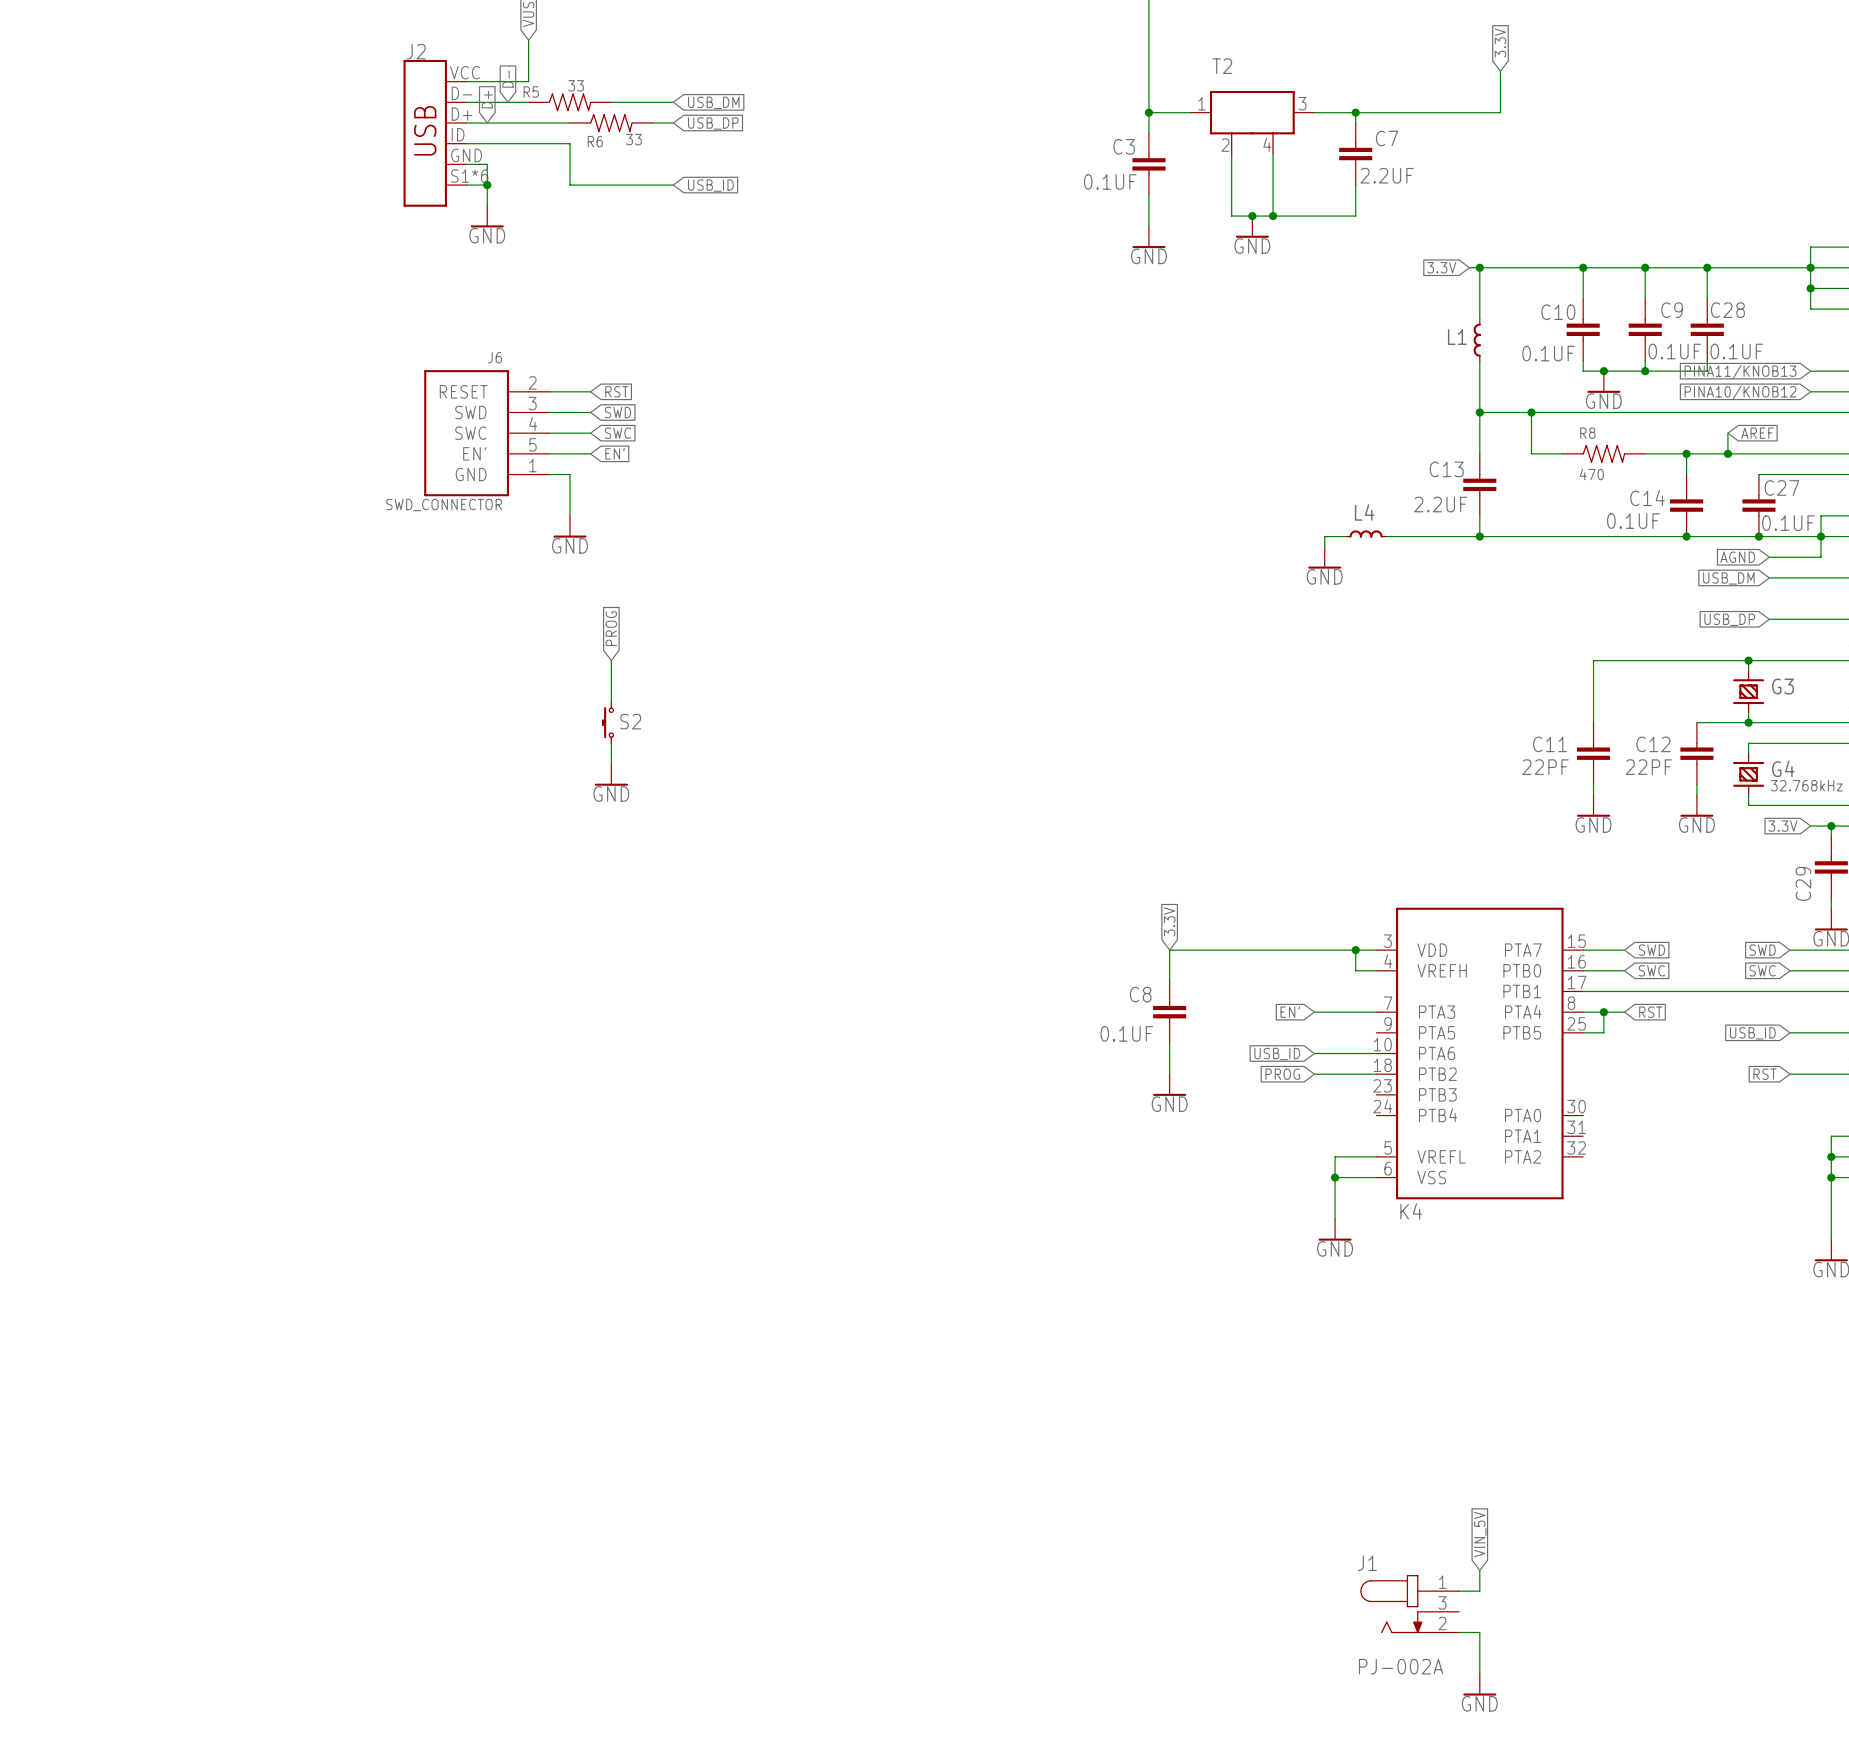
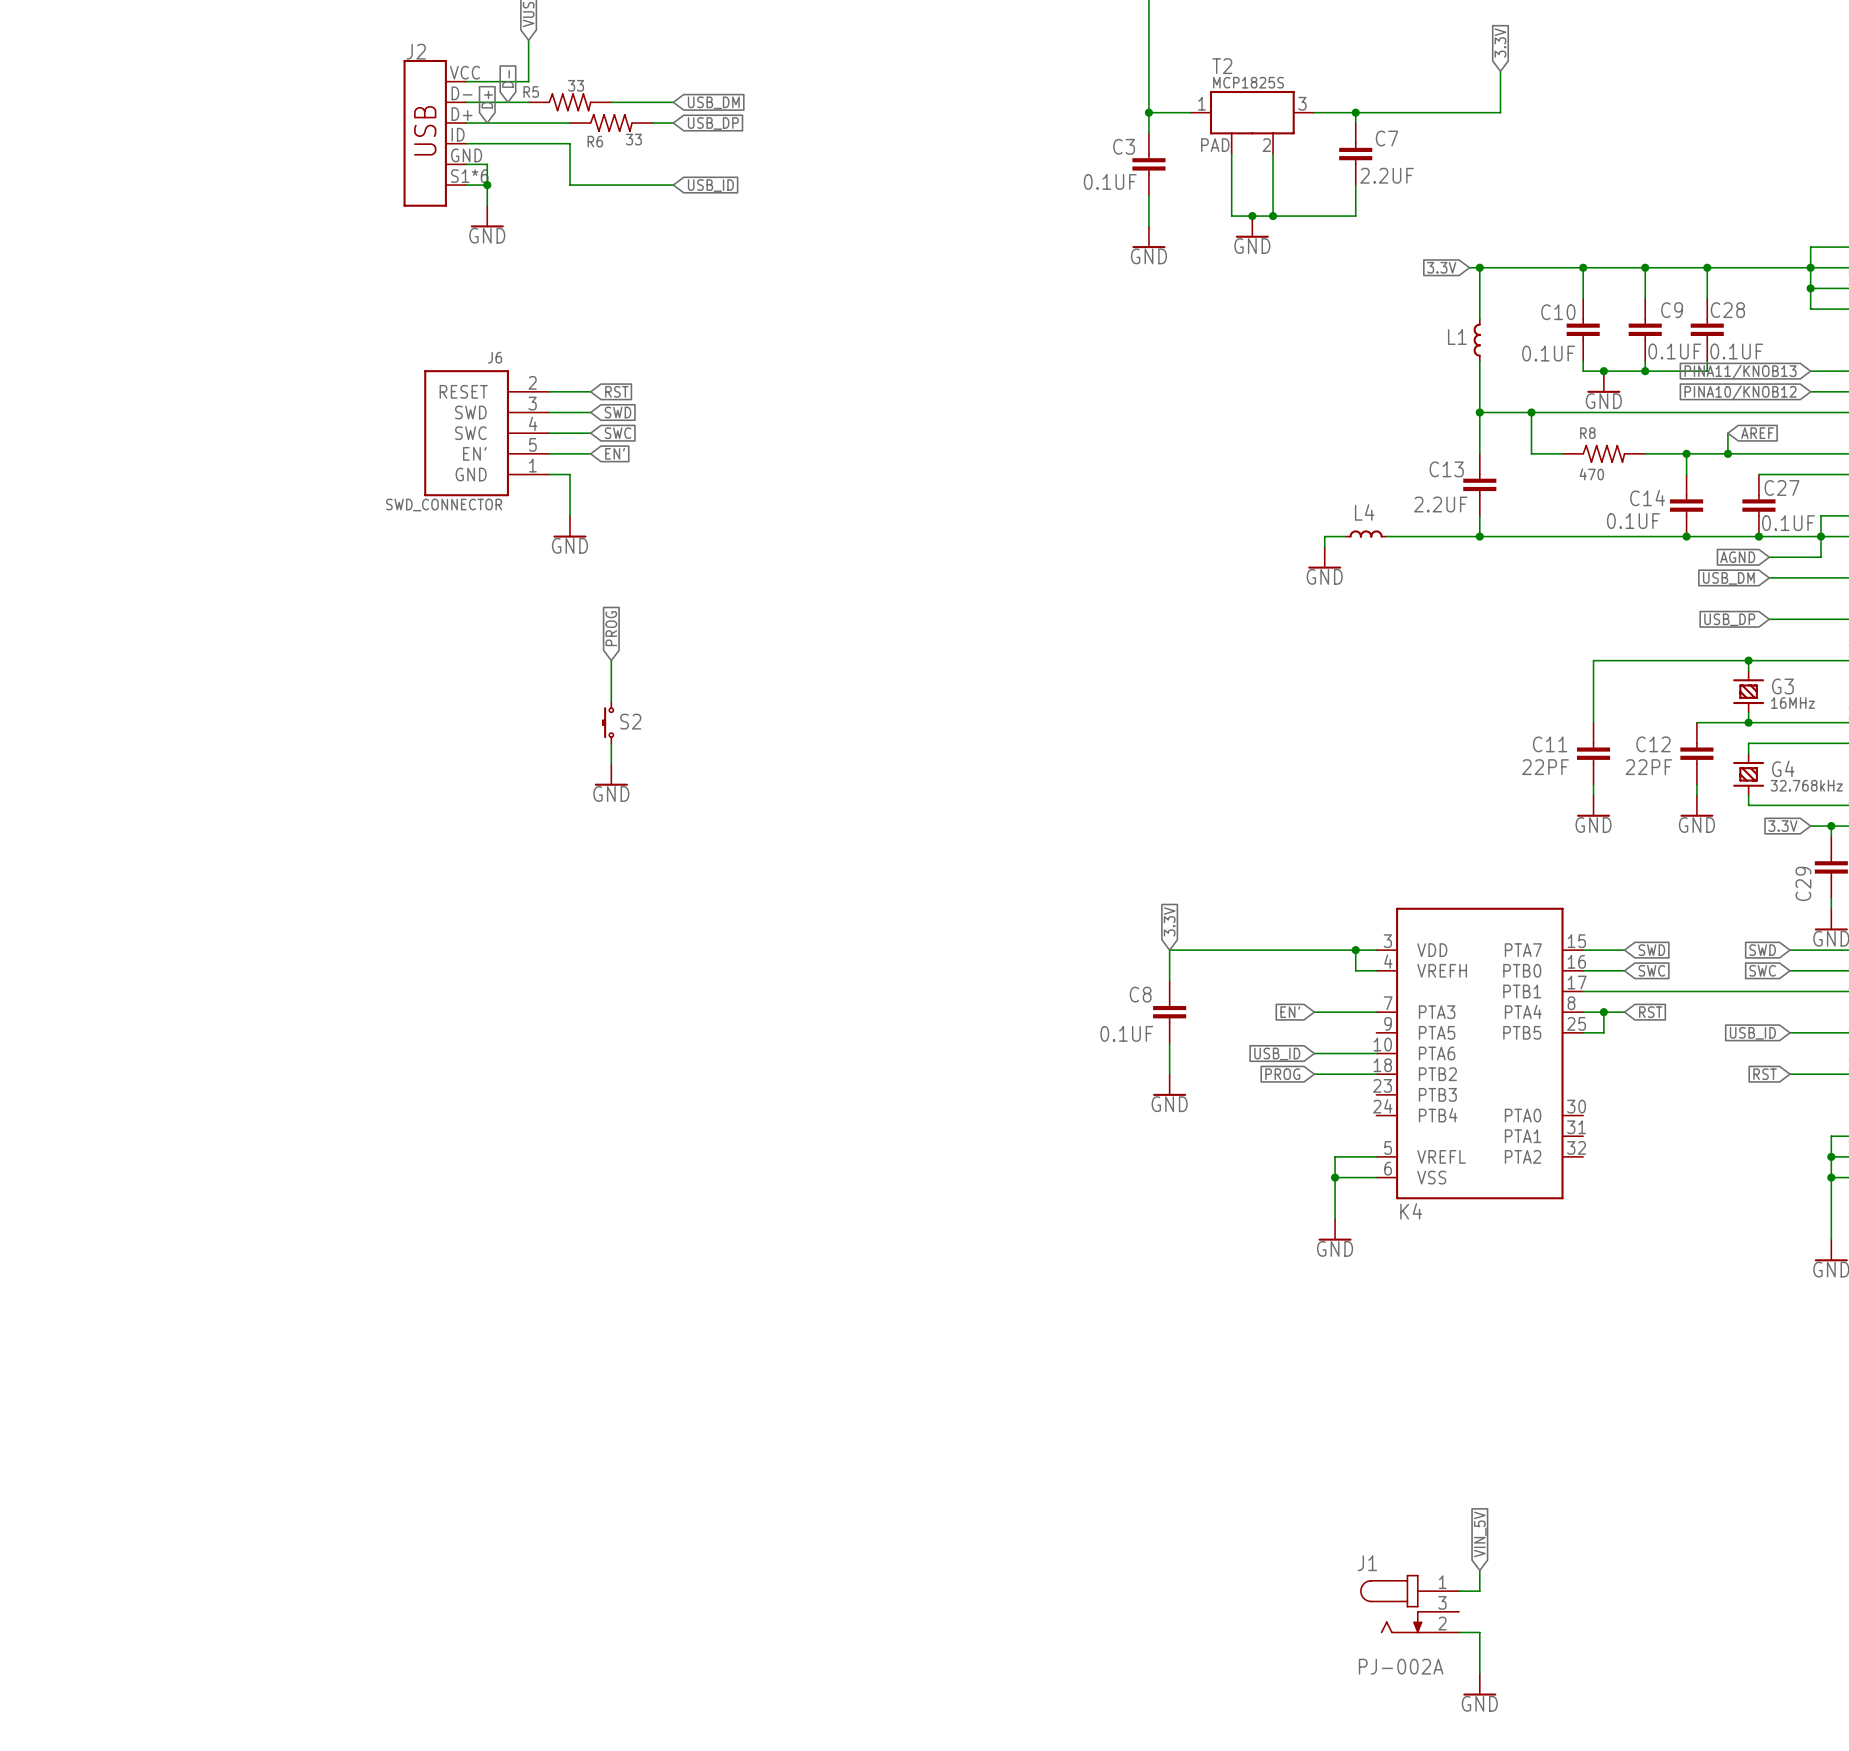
T2 value: none -> MCP1825S (1248, 82)
T2 pin number: 4 (1267, 144) -> 2 (1266, 145)
T2 pin number: 2 (1225, 145) -> PAD (1215, 145)
G3 value: none -> 16MHz (1793, 703)

